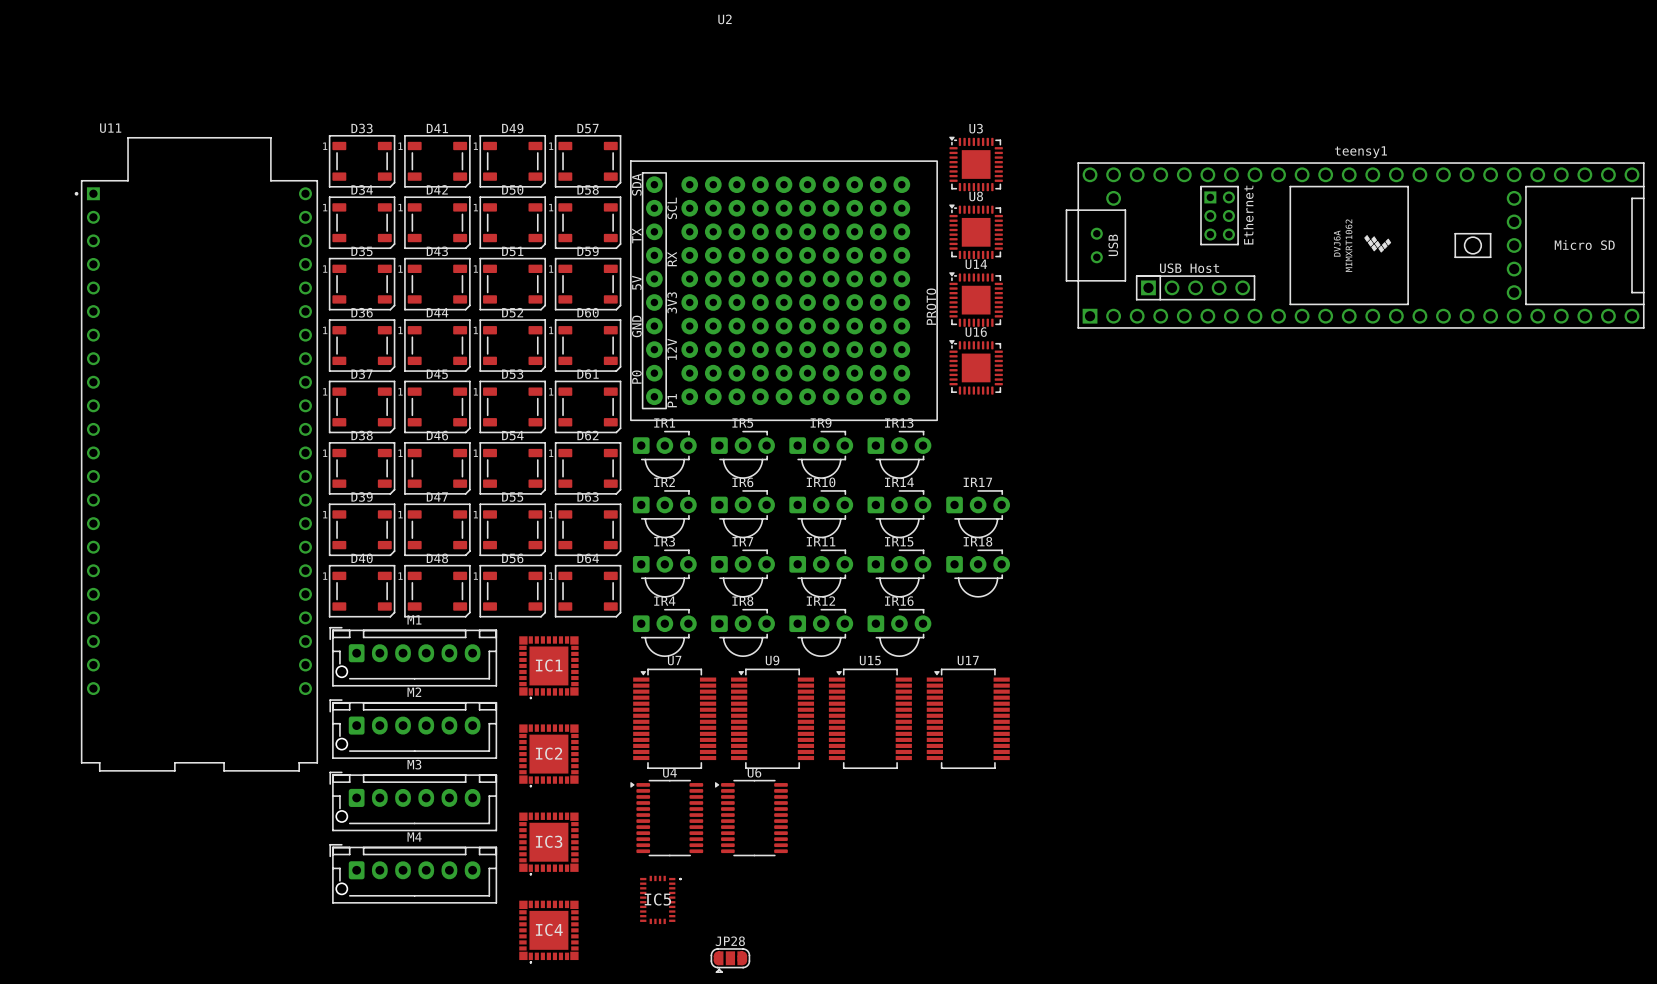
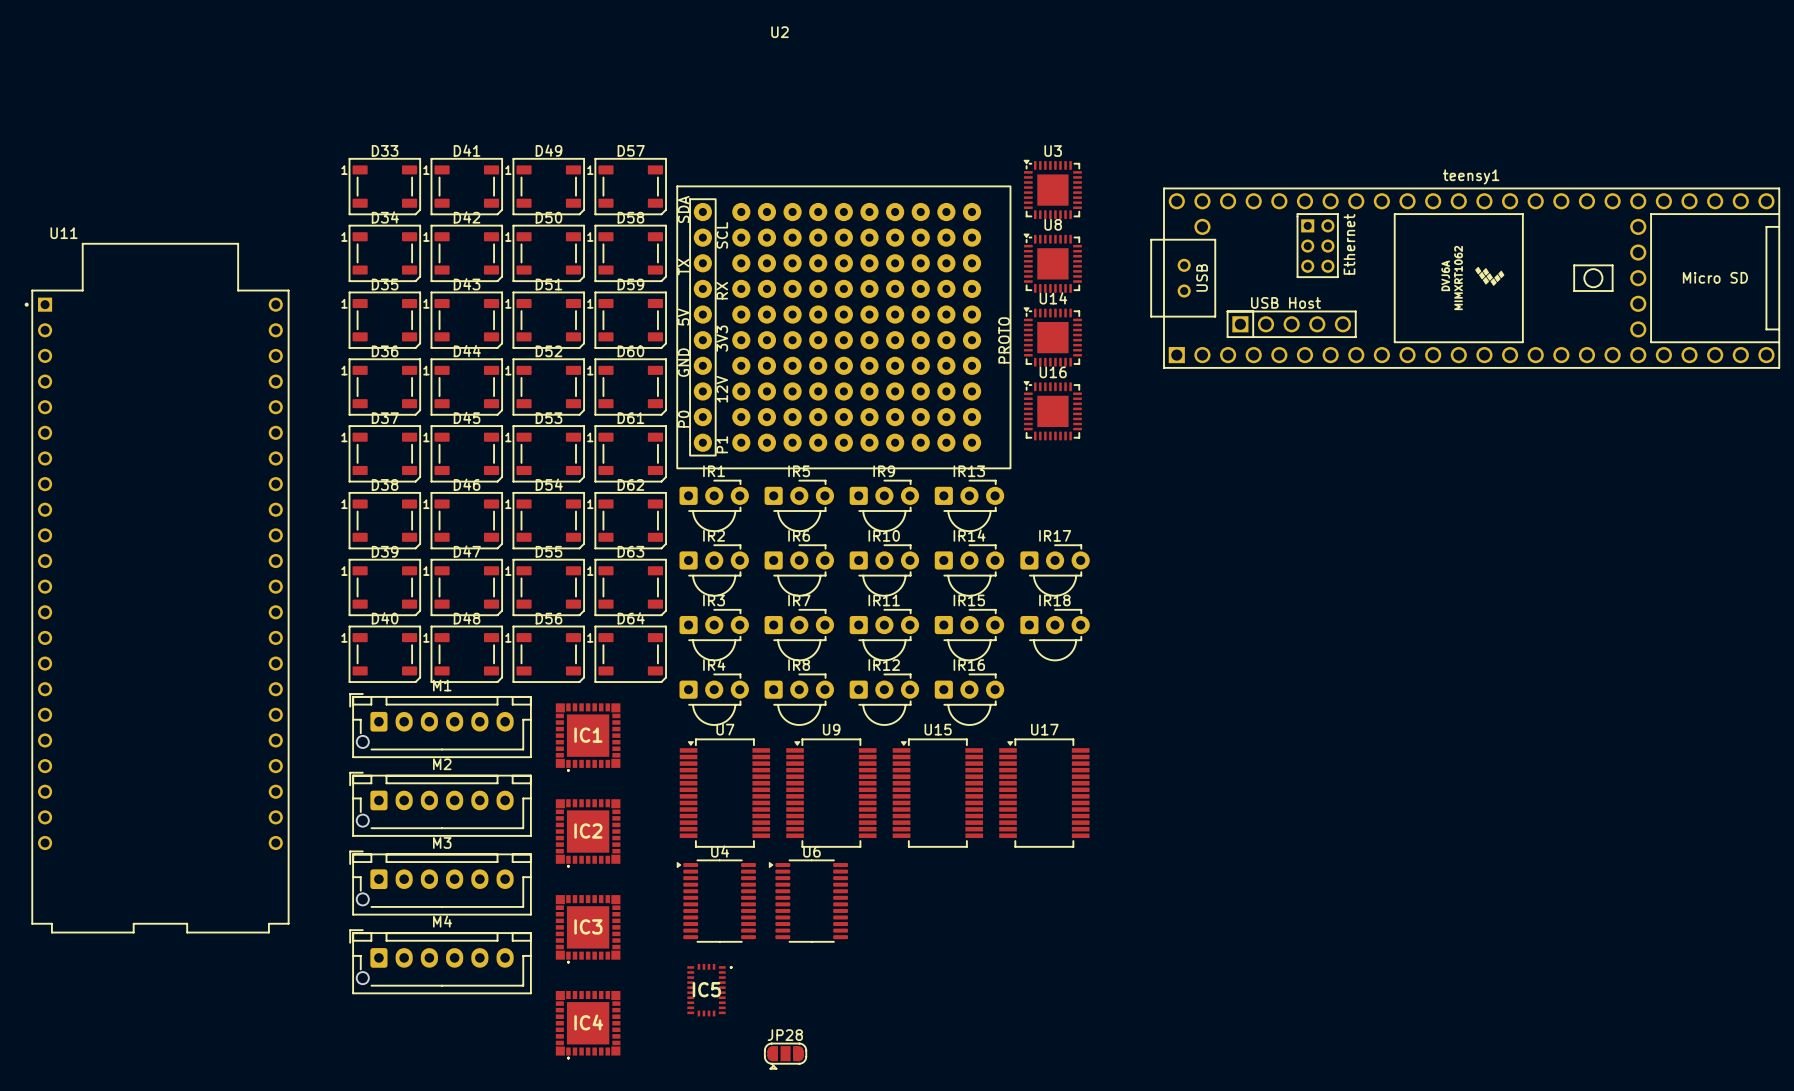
U11 position: (196, 454) -> (156, 588)

